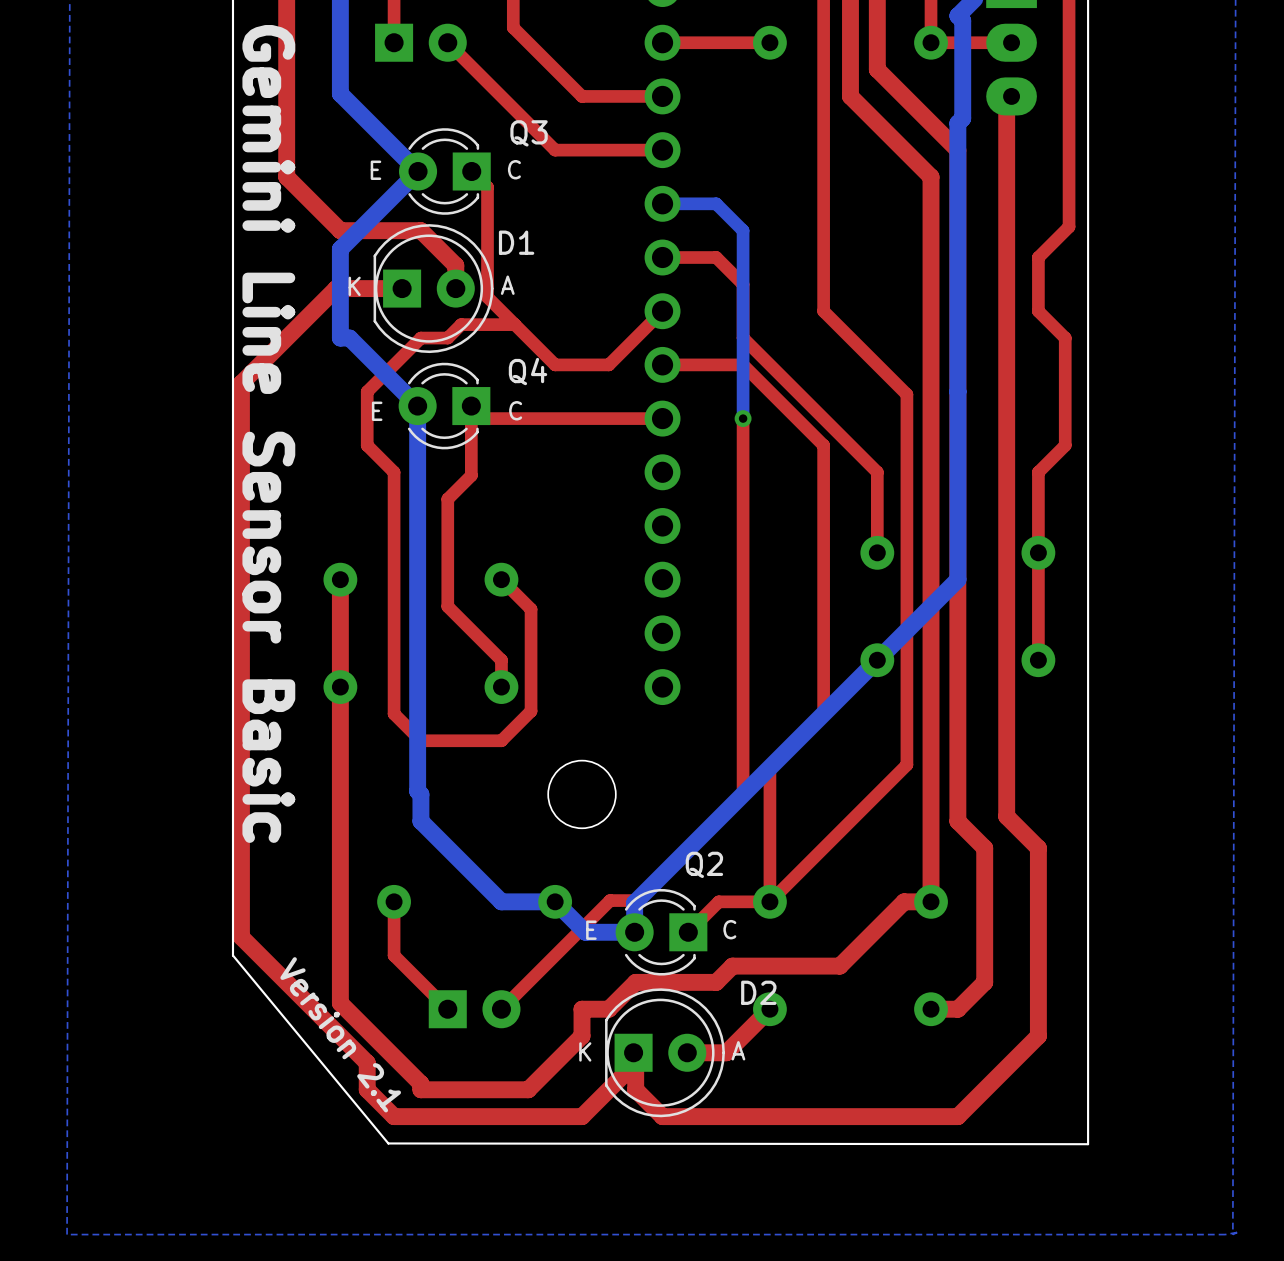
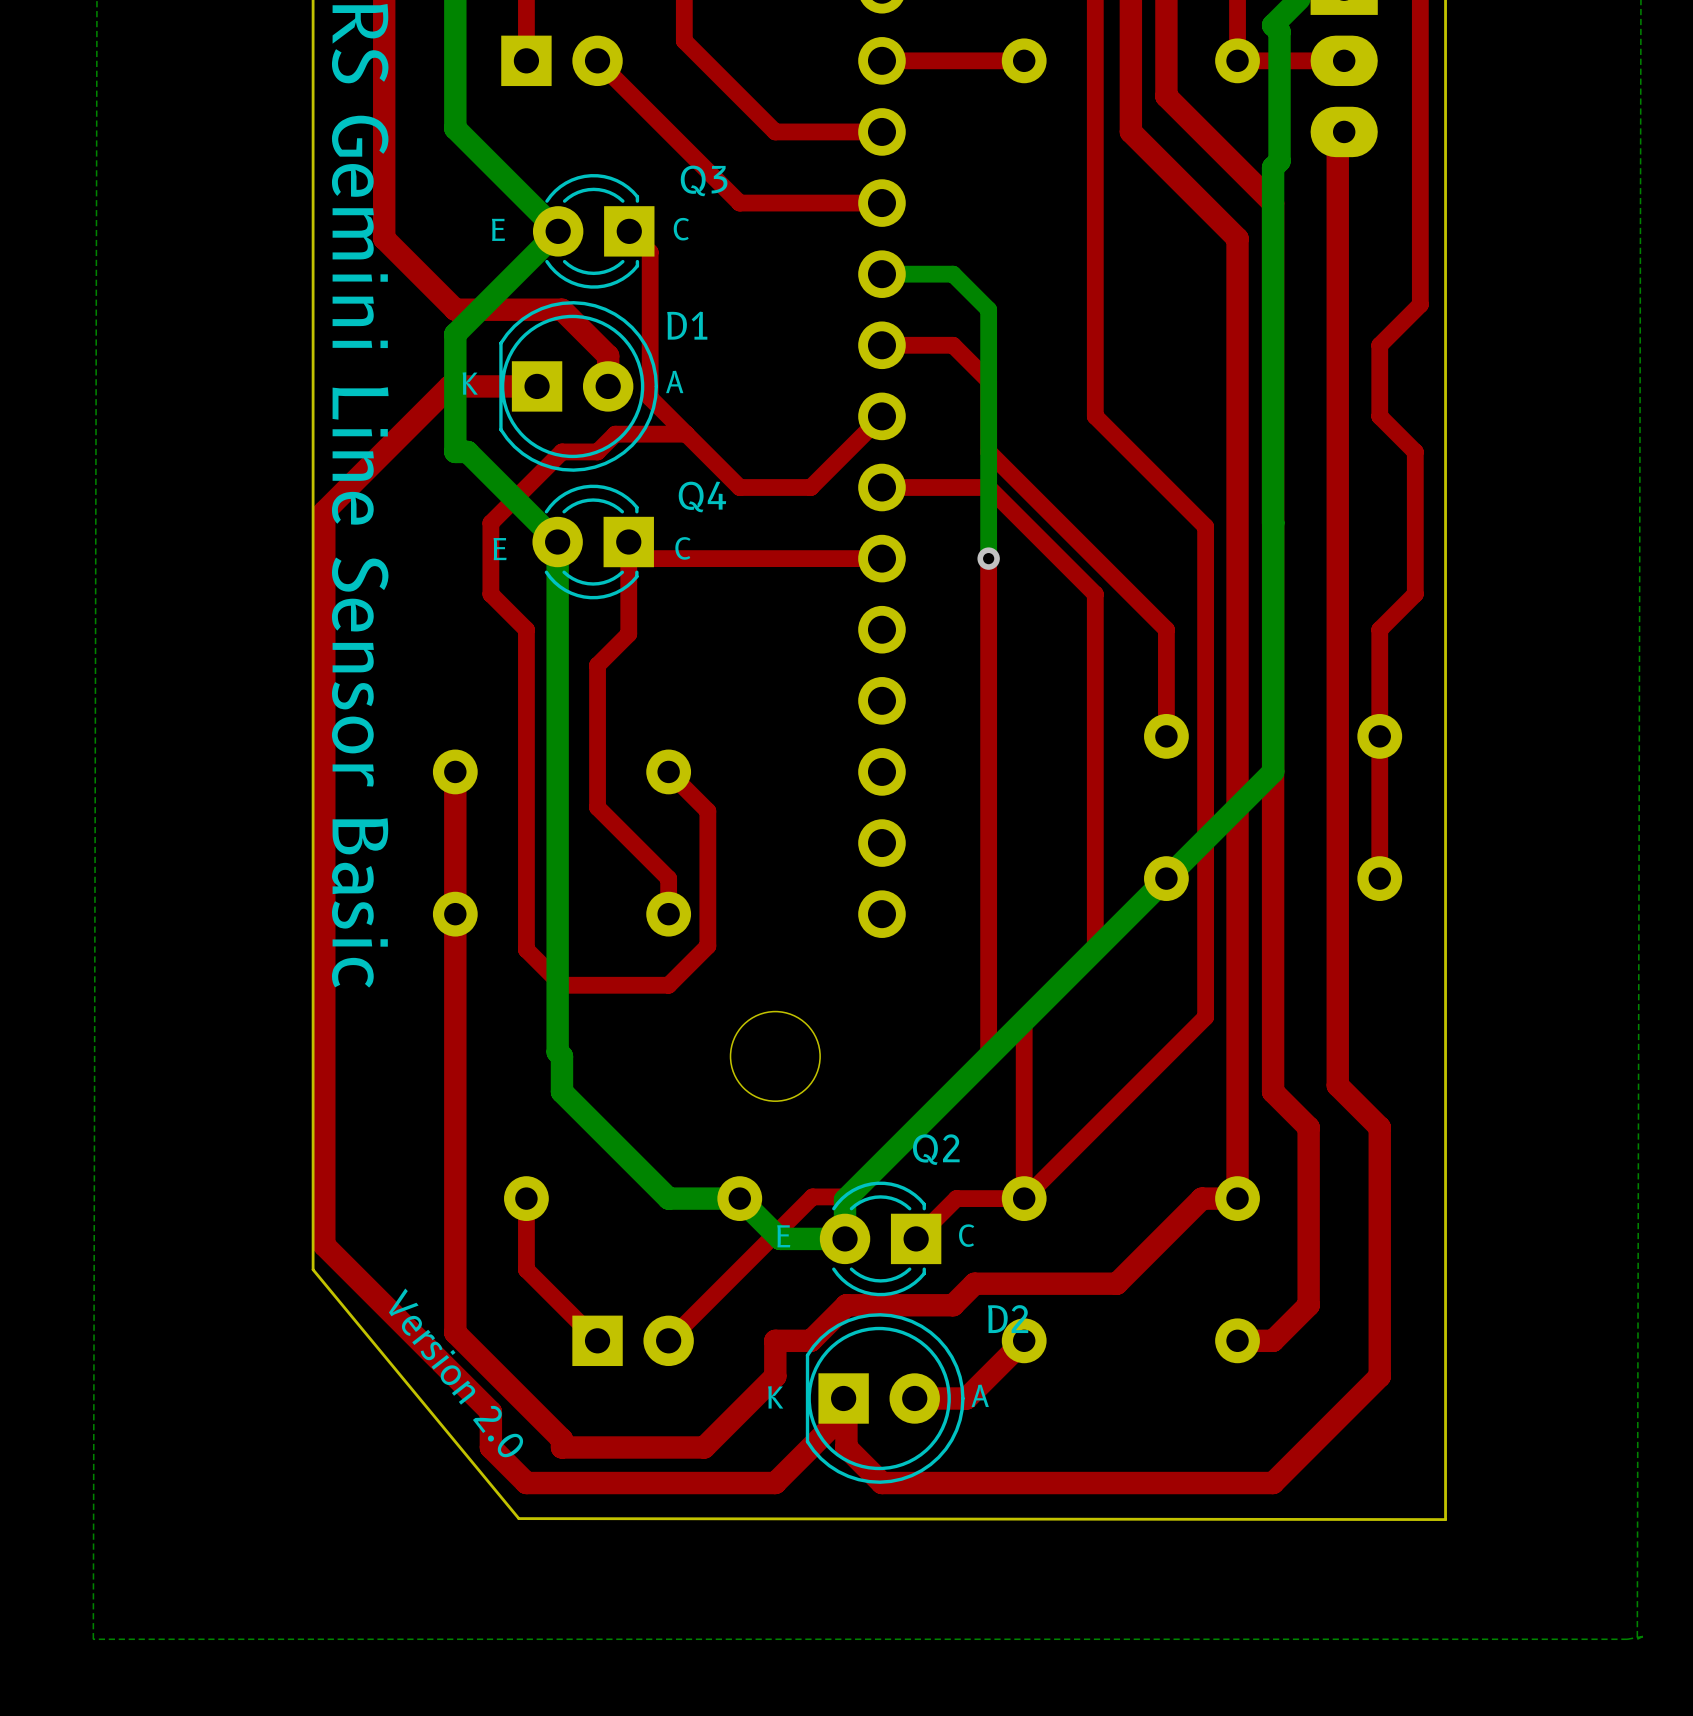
text: Version 2.1 (340, 1034) -> Version 2.0 (456, 1372)

